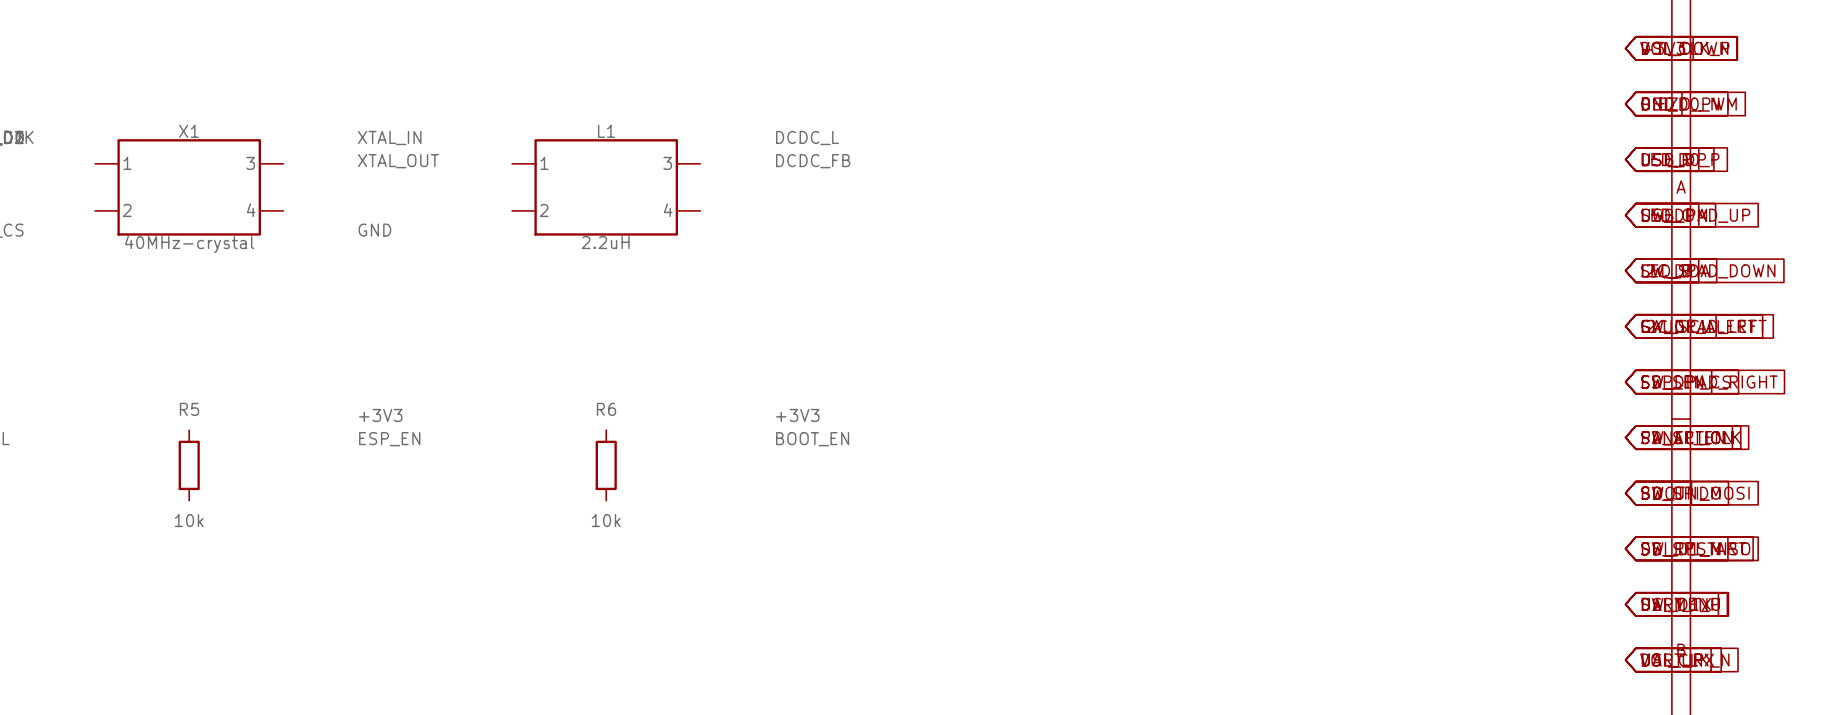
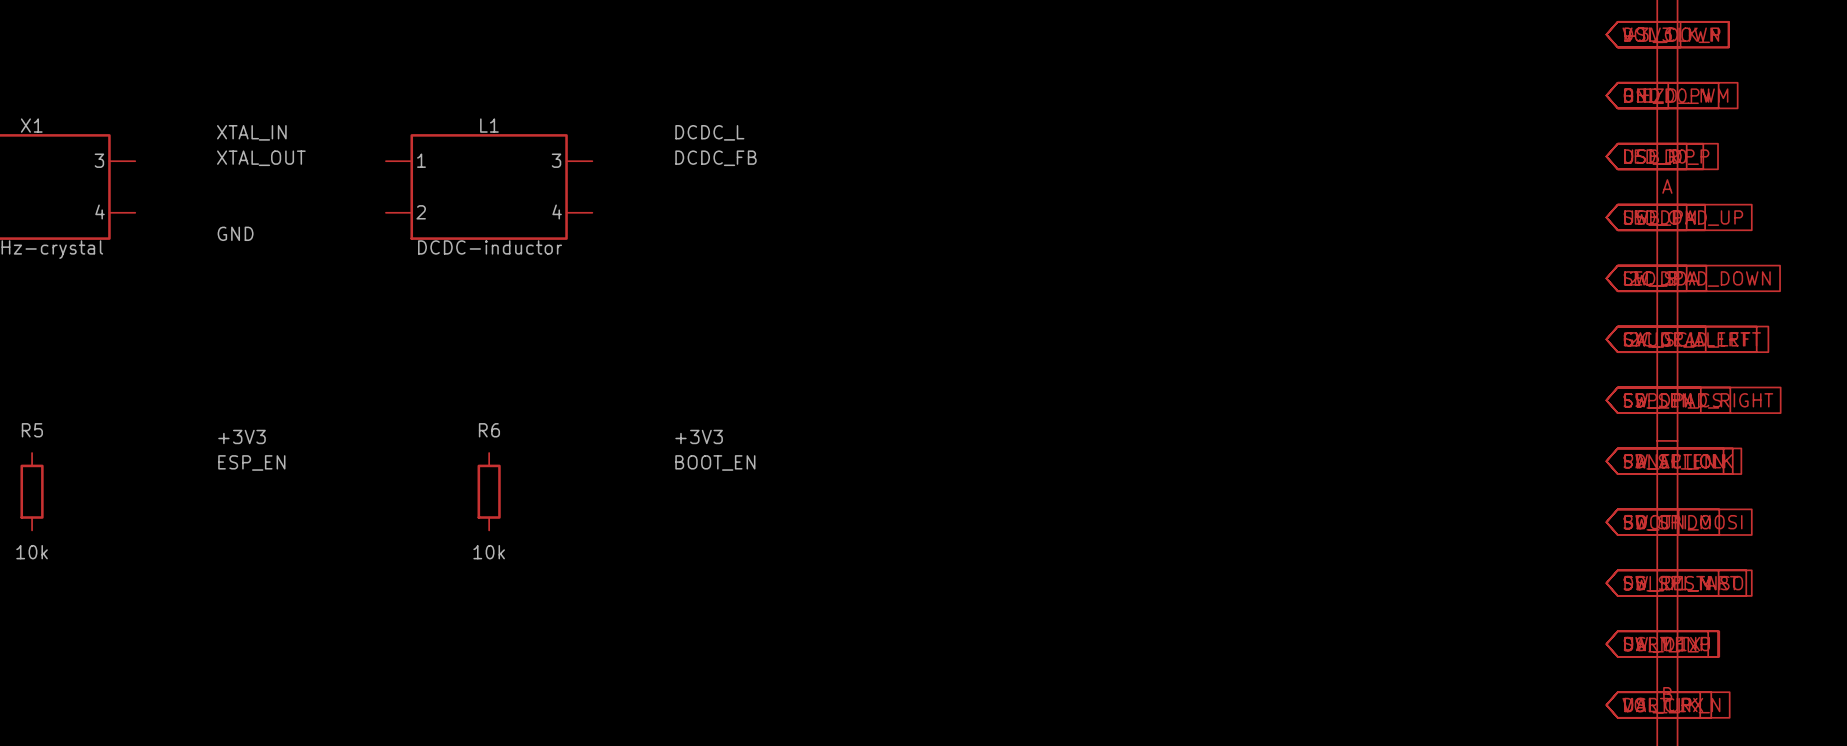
L1 value: 2.2uH (605, 242) -> DCDC-inductor (490, 247)

